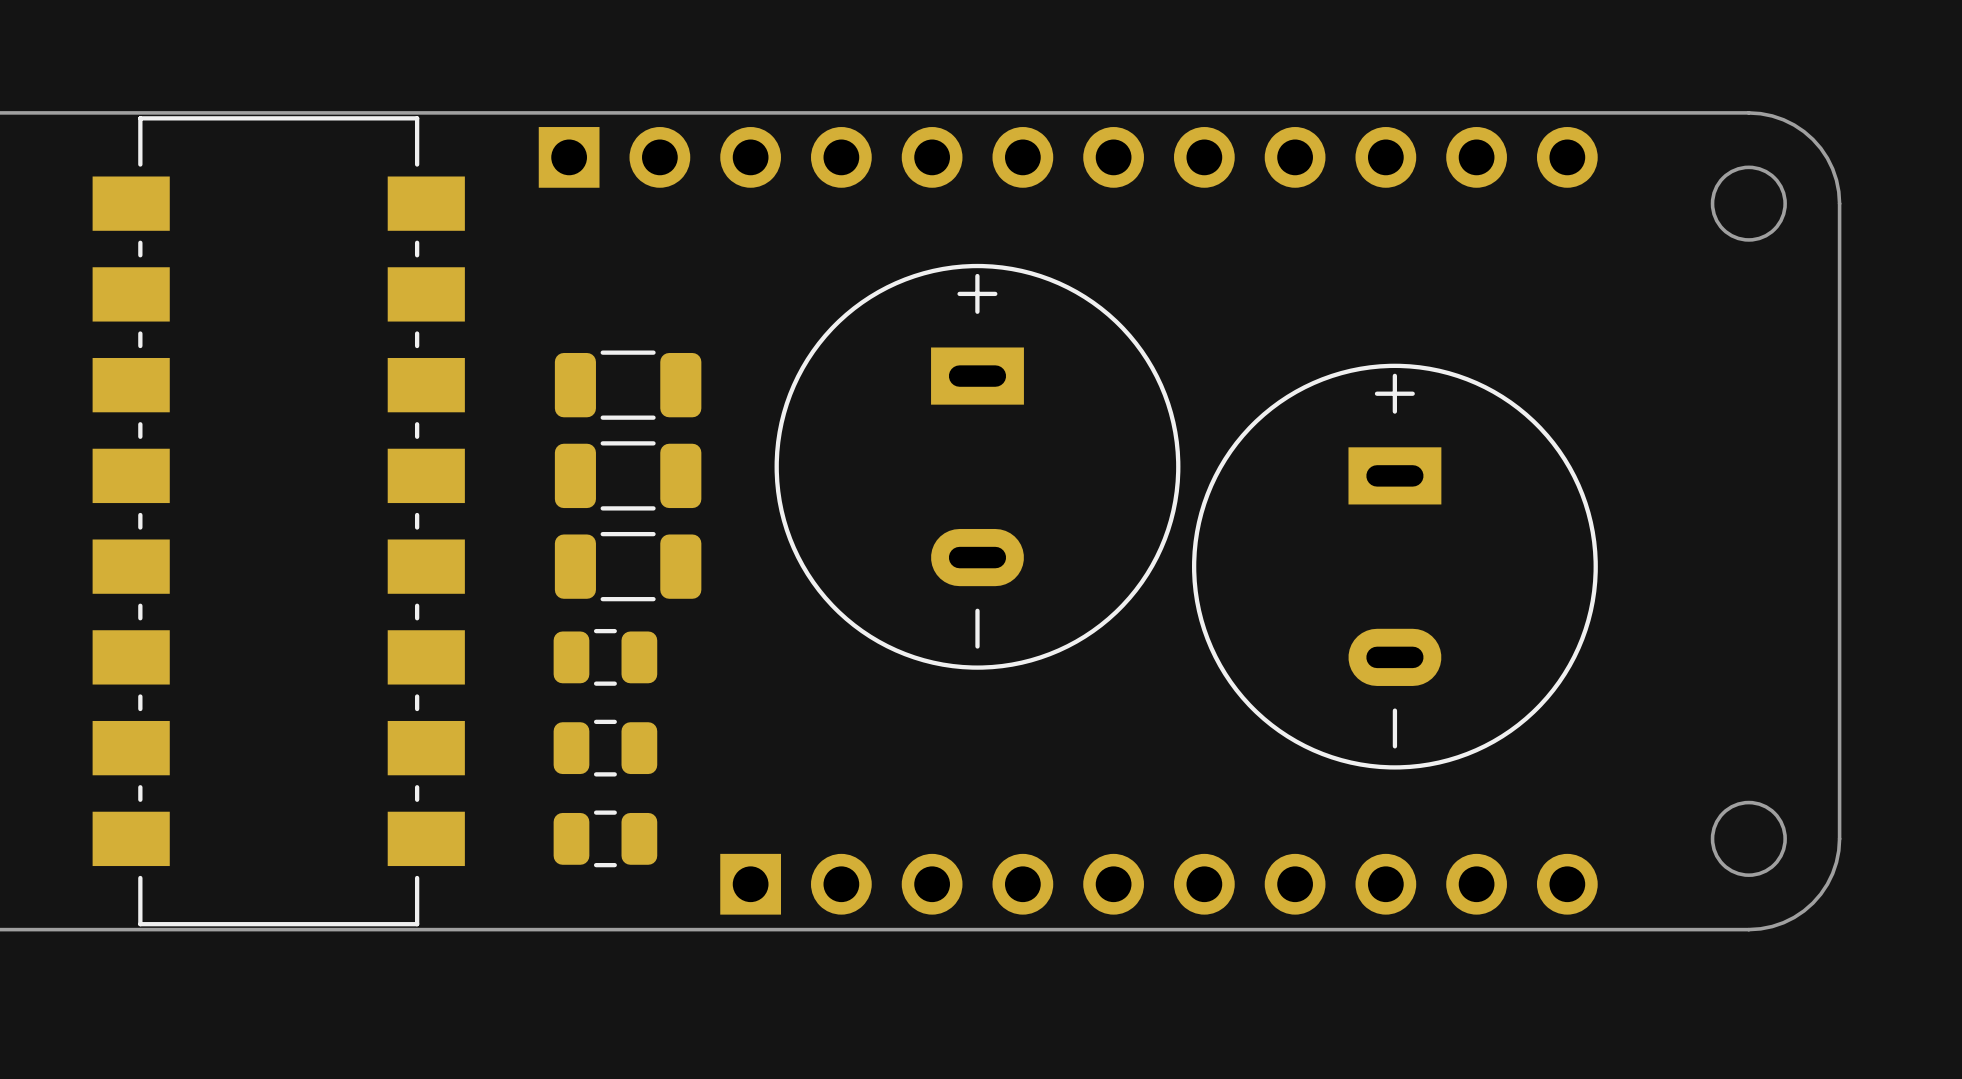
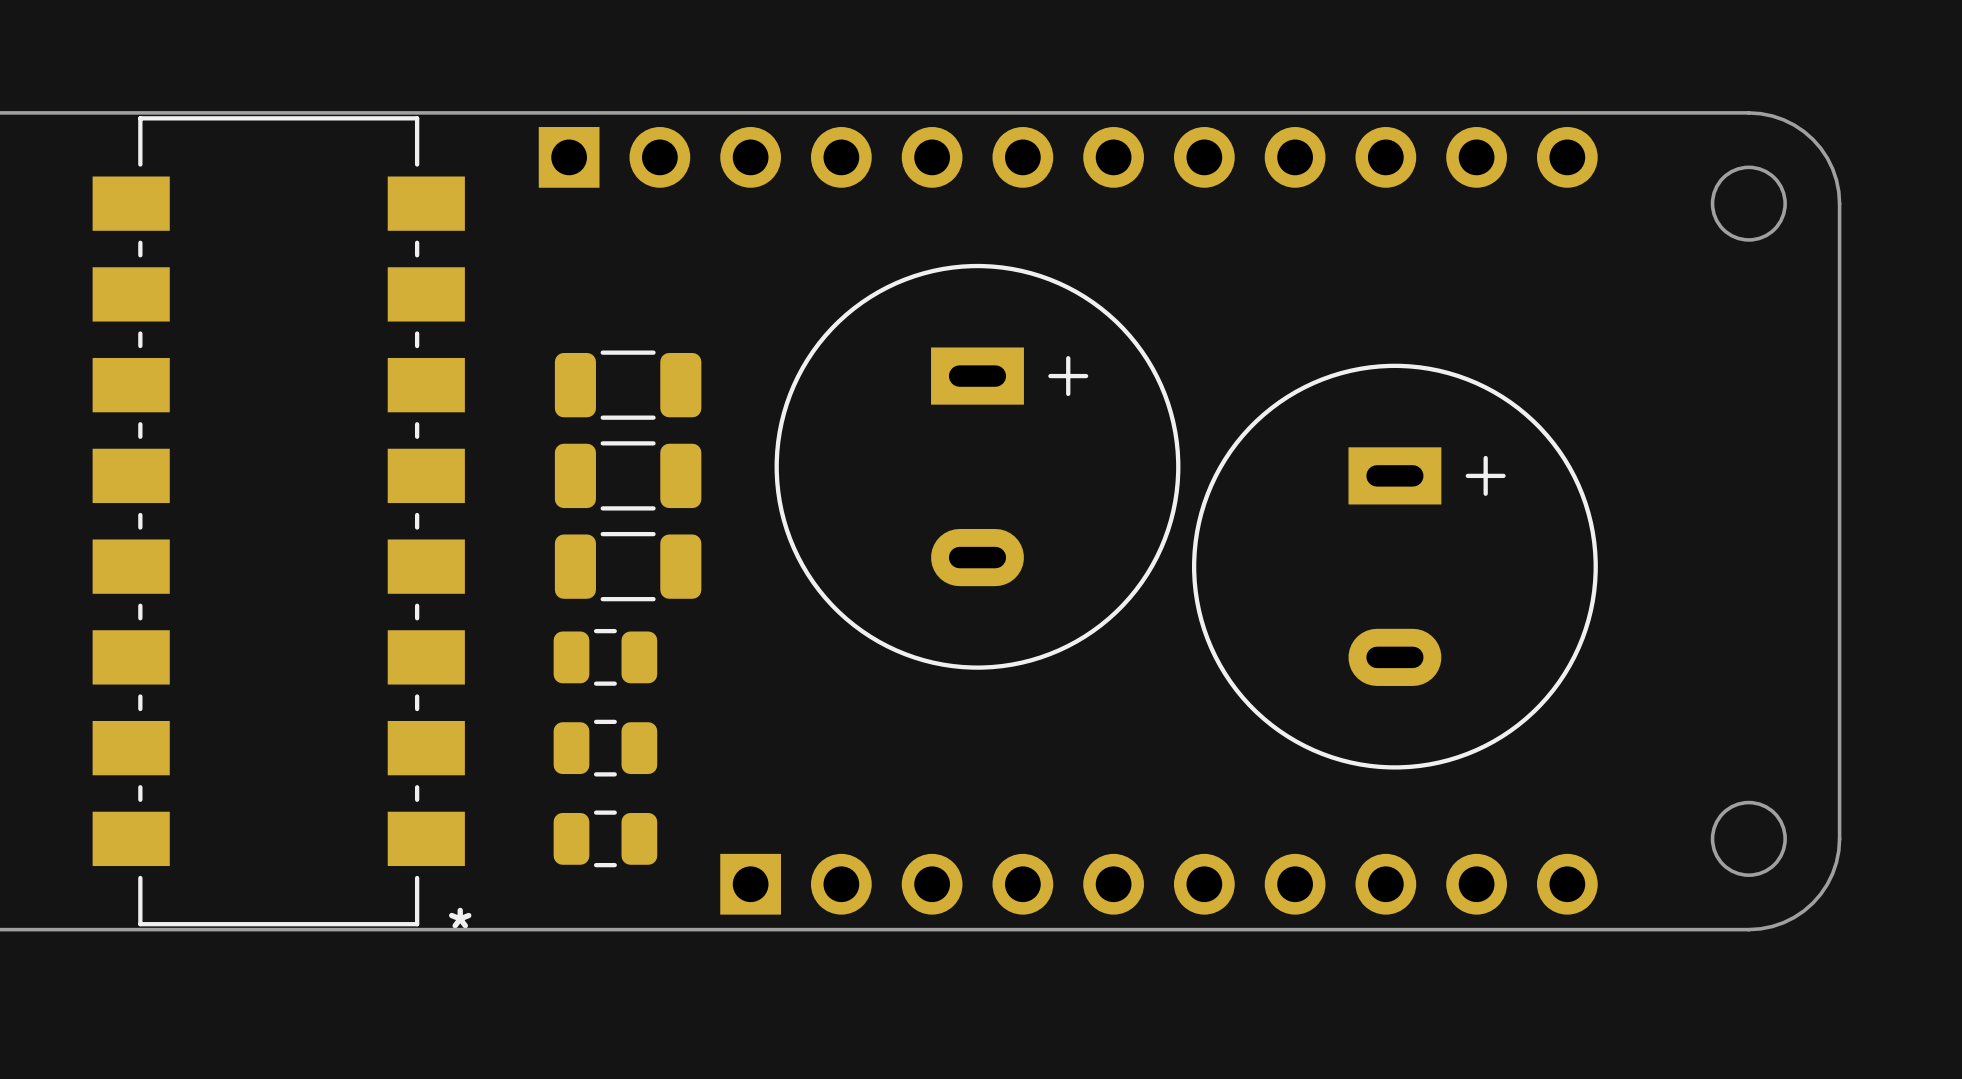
part footprint: [774, 263, 1181, 670] -> [774, 263, 1181, 670]
part footprint: [1191, 363, 1598, 770] -> [1191, 363, 1598, 770]
part text: none -> * (460, 918)

